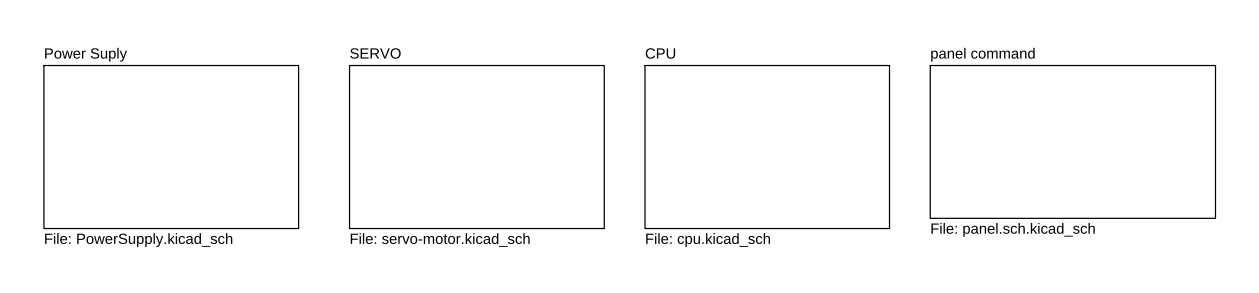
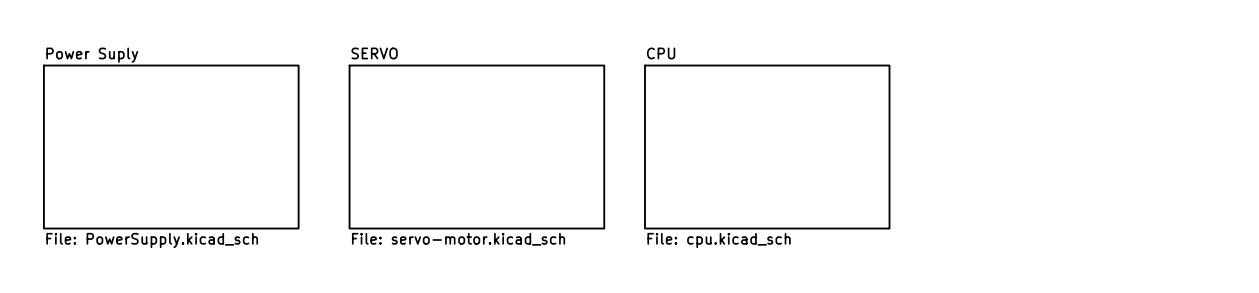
sheet panel command: File: panel.sch.kicad_sch (1072, 141) -> none

